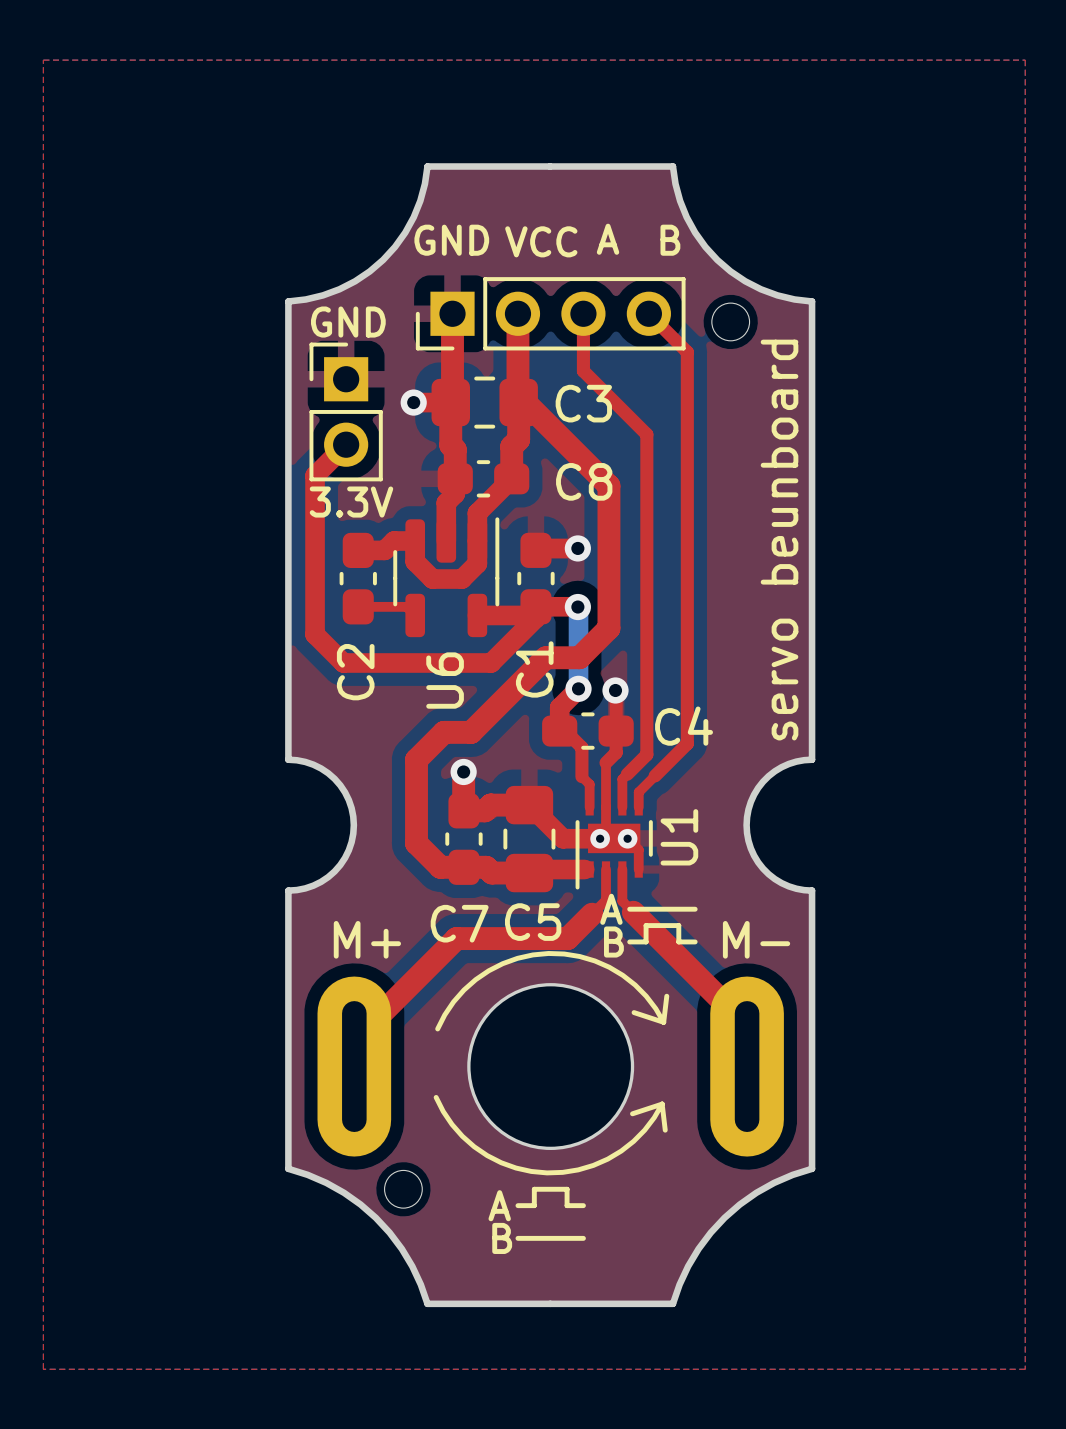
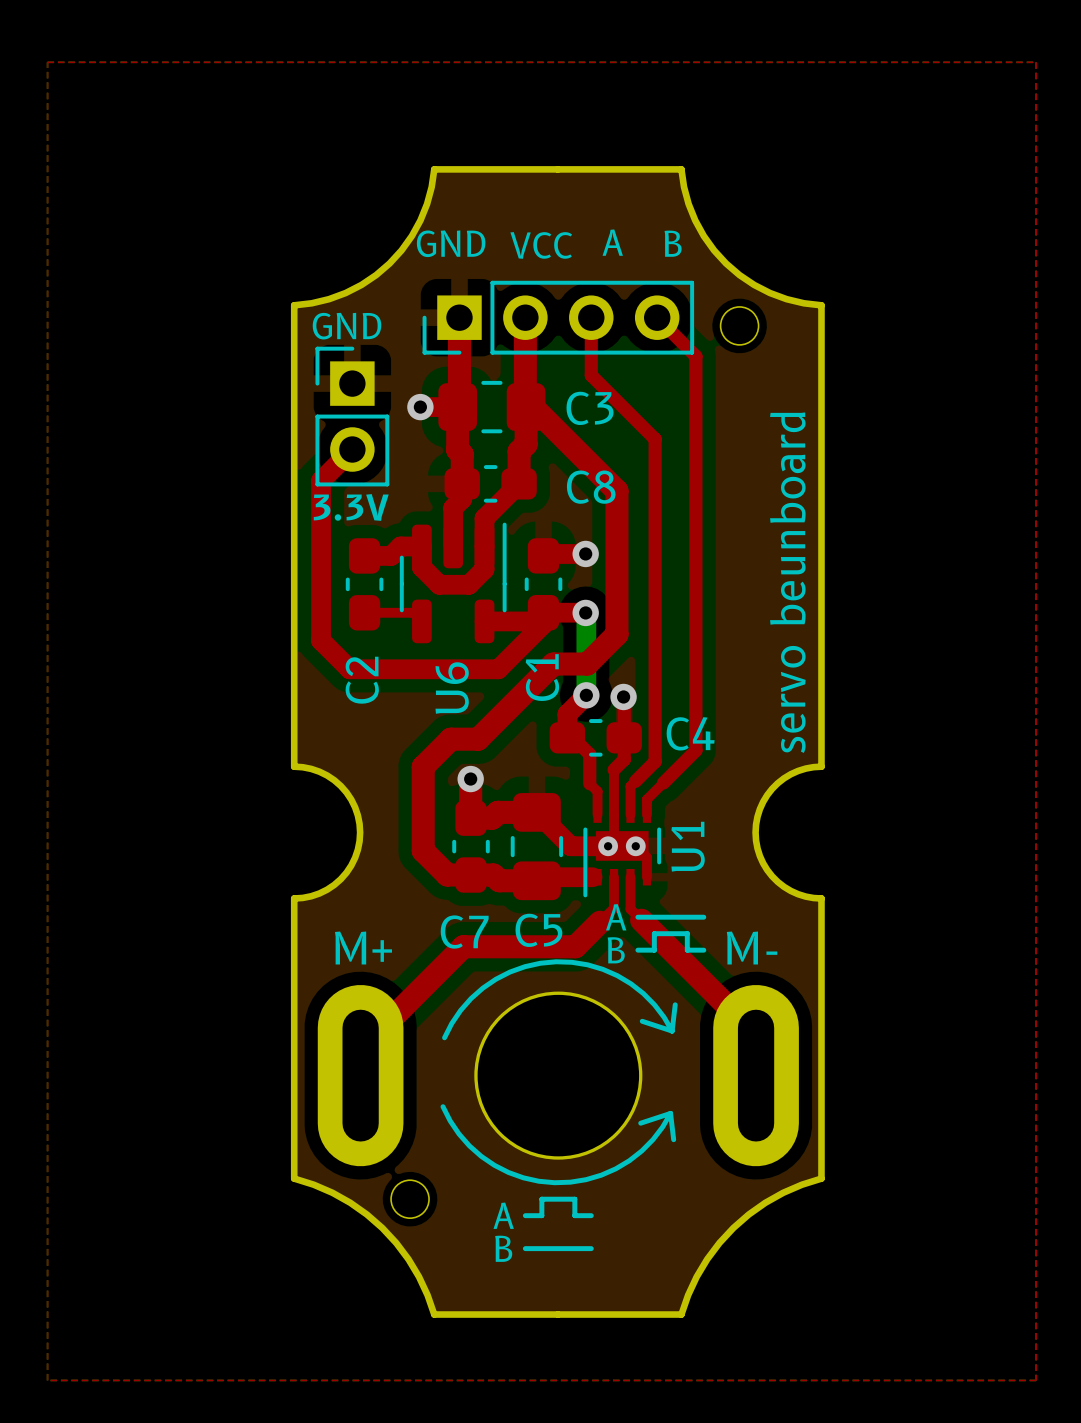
part footprint: [317, 976, 784, 1157] -> [317, 985, 799, 1167]

